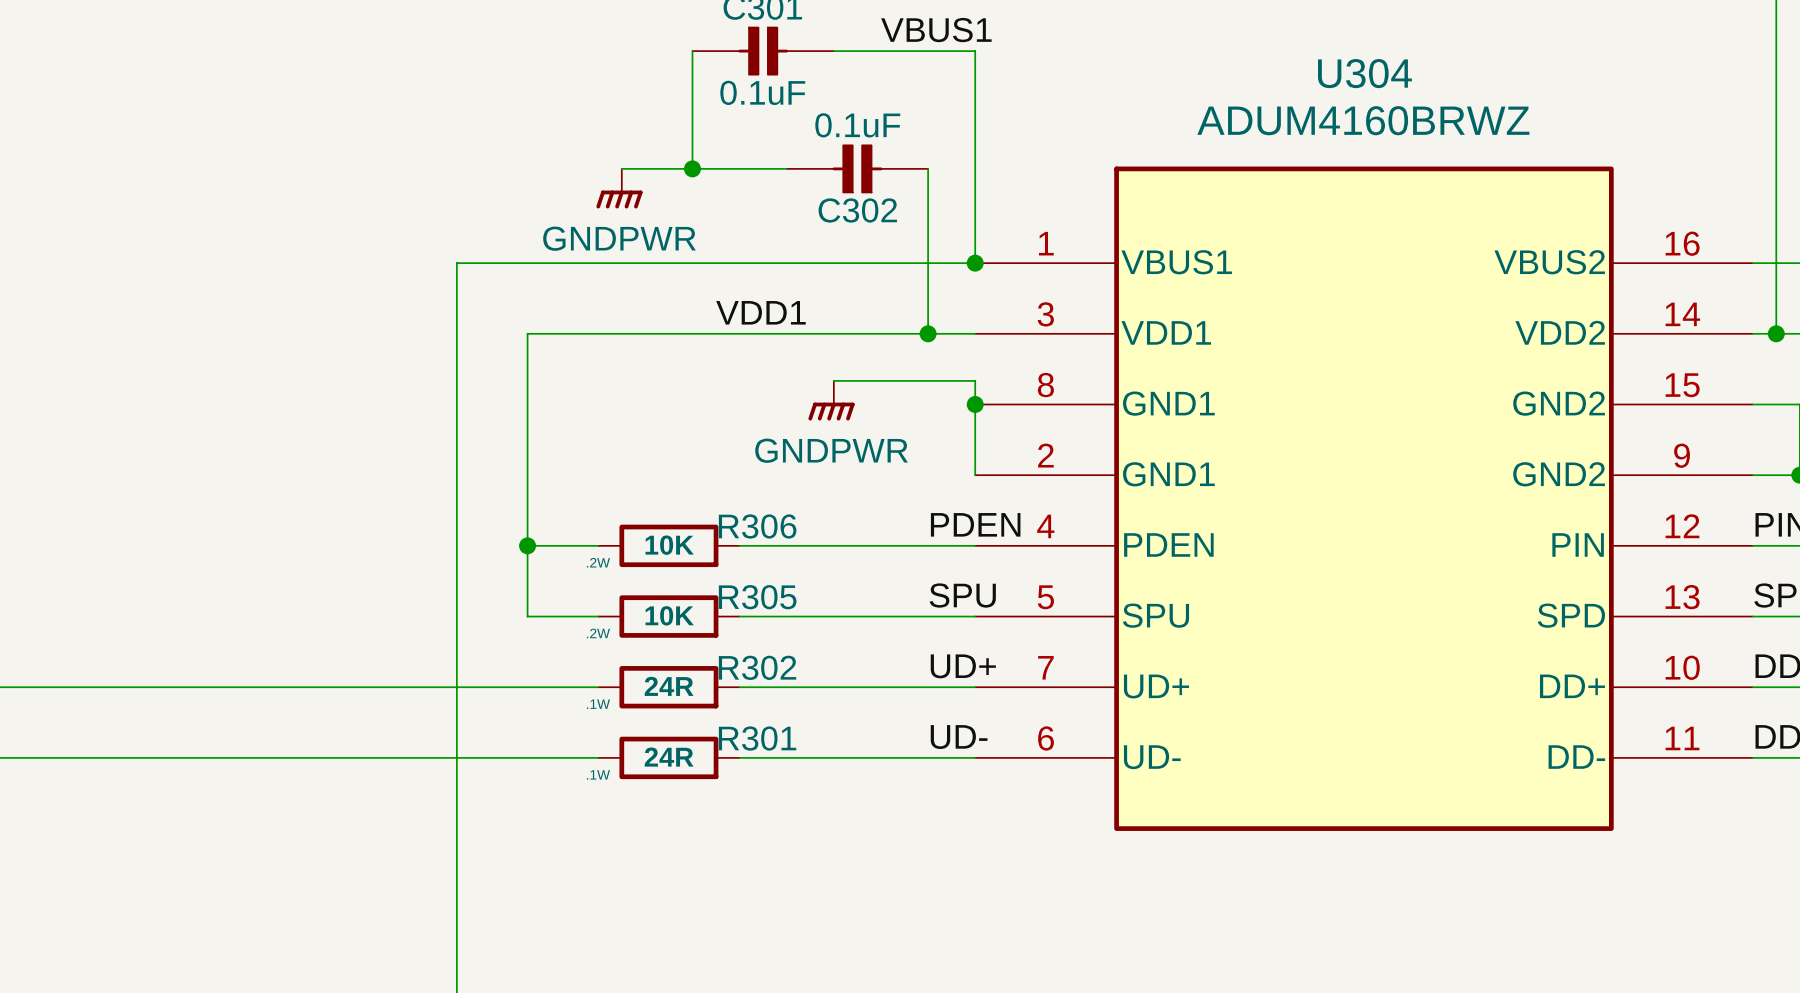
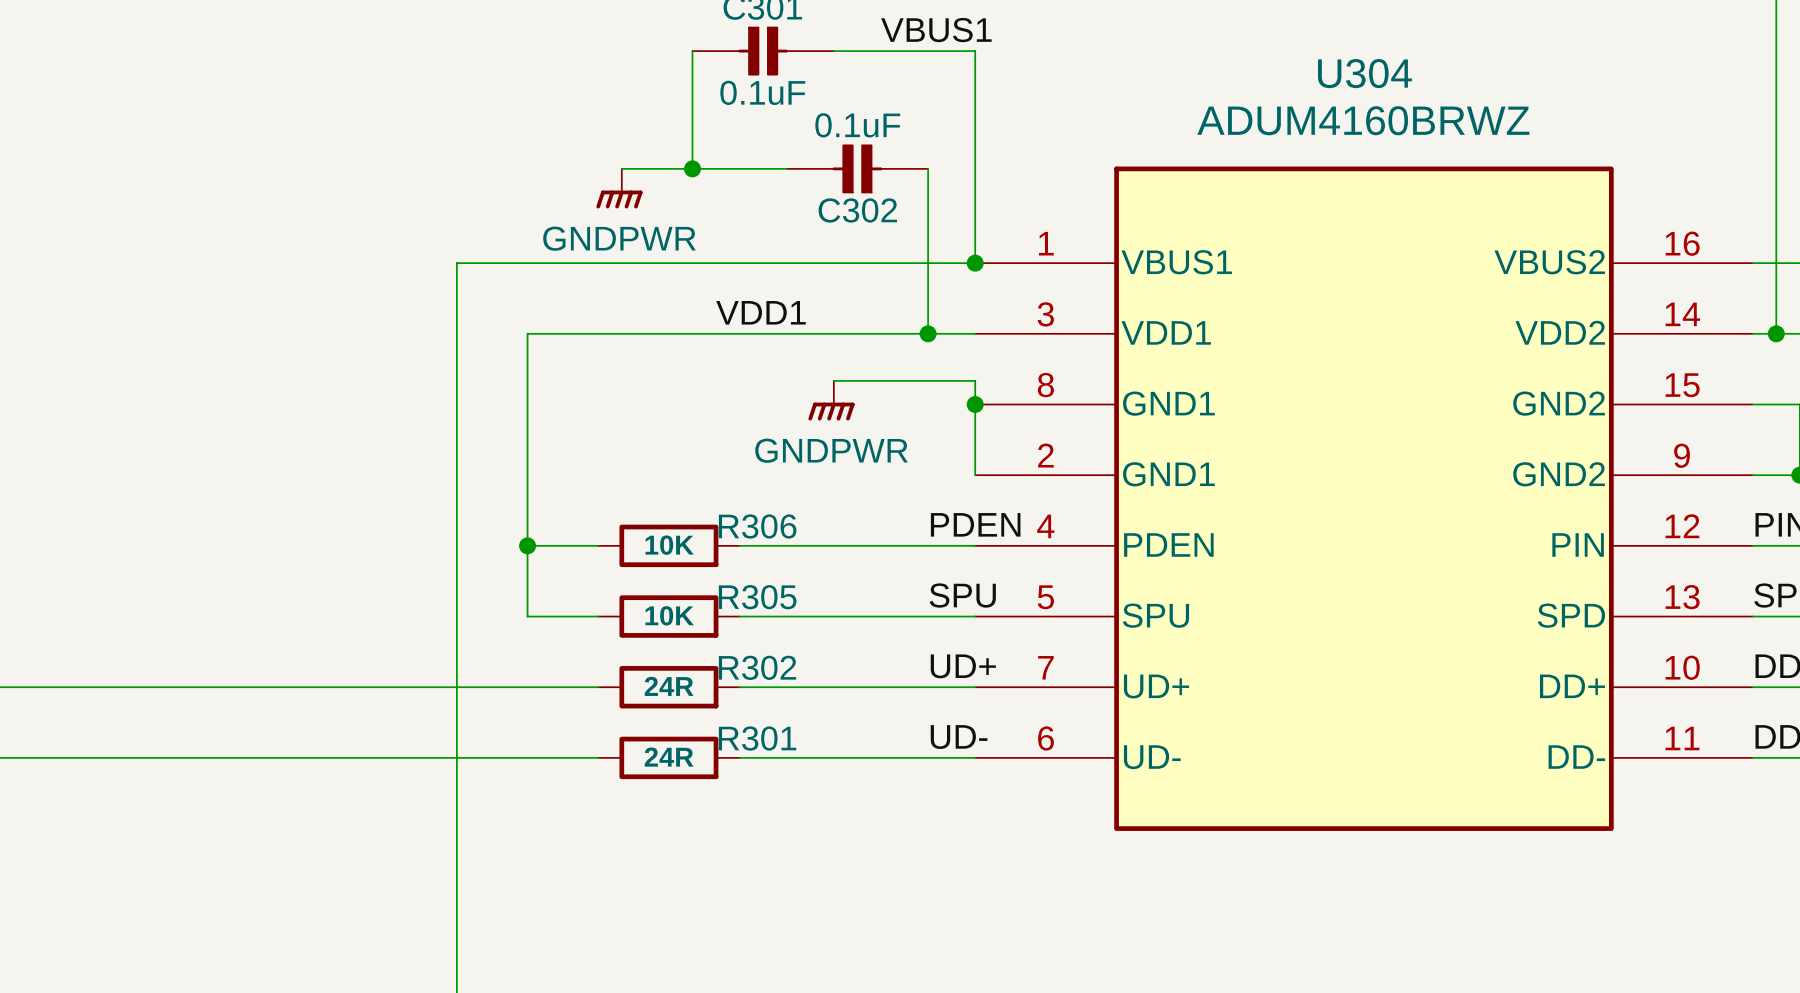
R306 text: .2W (598, 562) -> none
R305 text: .2W (598, 633) -> none
R302 text: .1W (598, 704) -> none
R301 text: .1W (598, 774) -> none

